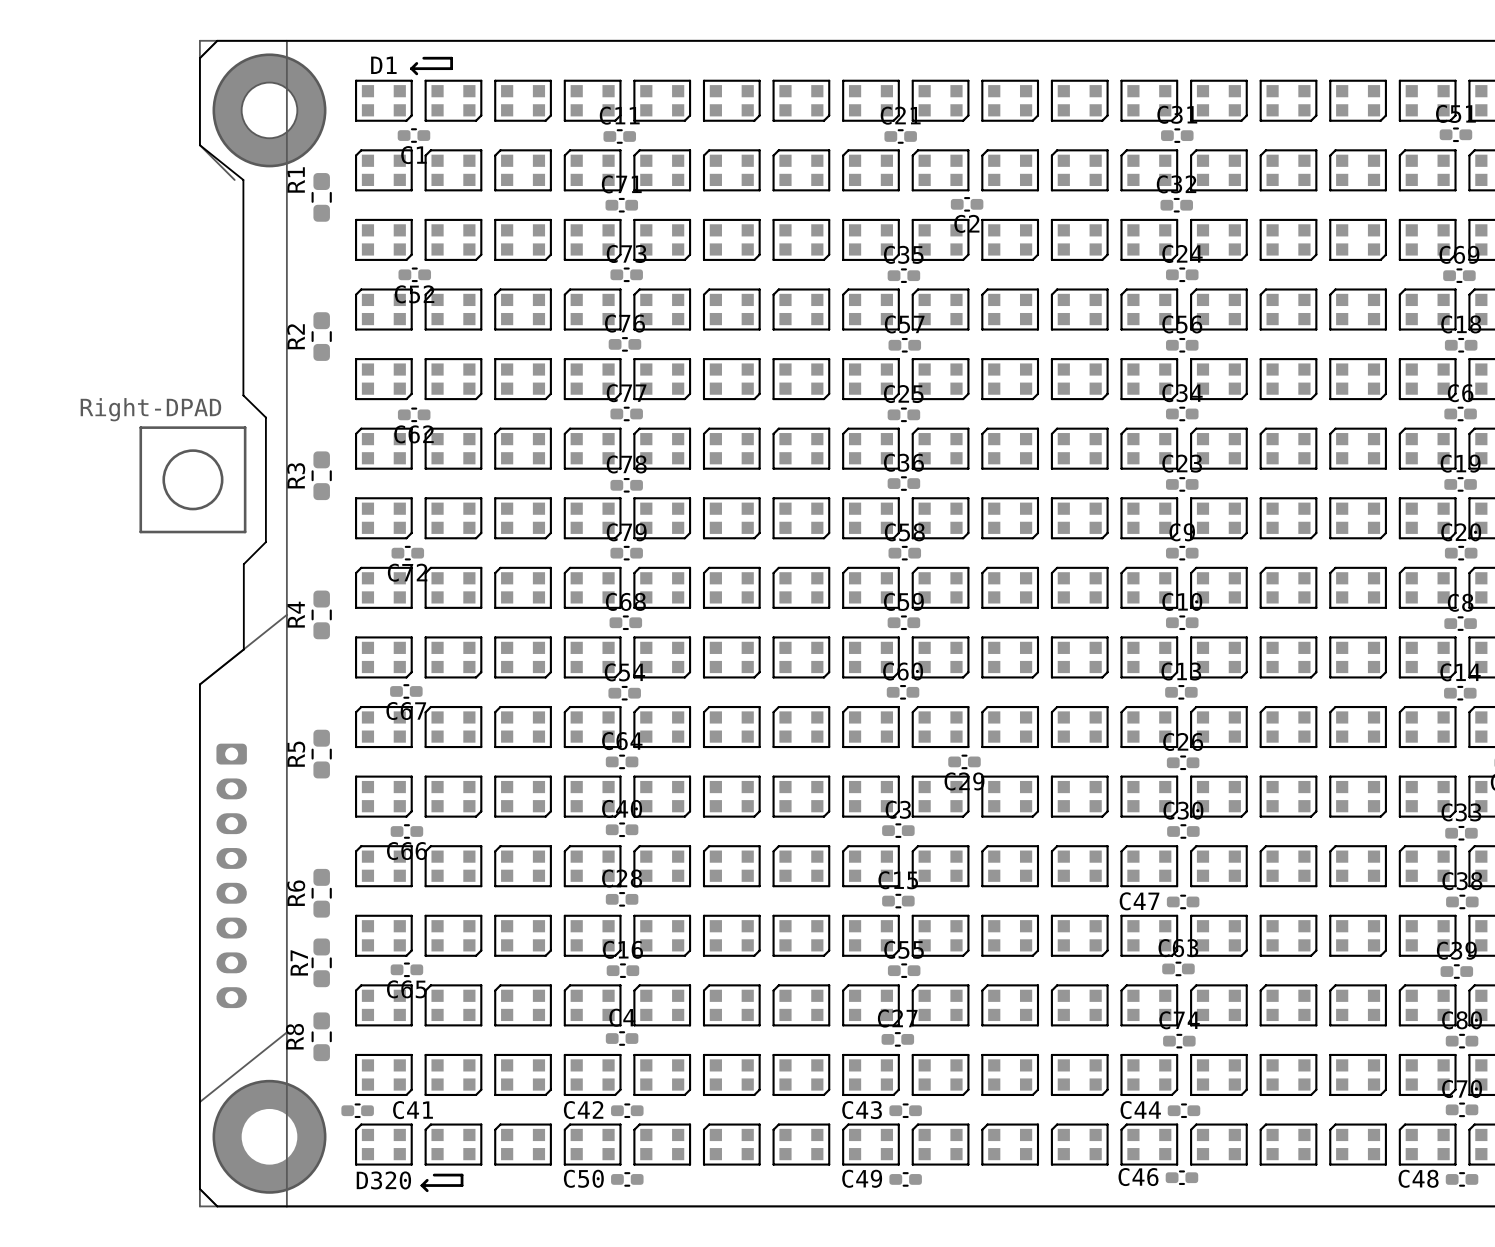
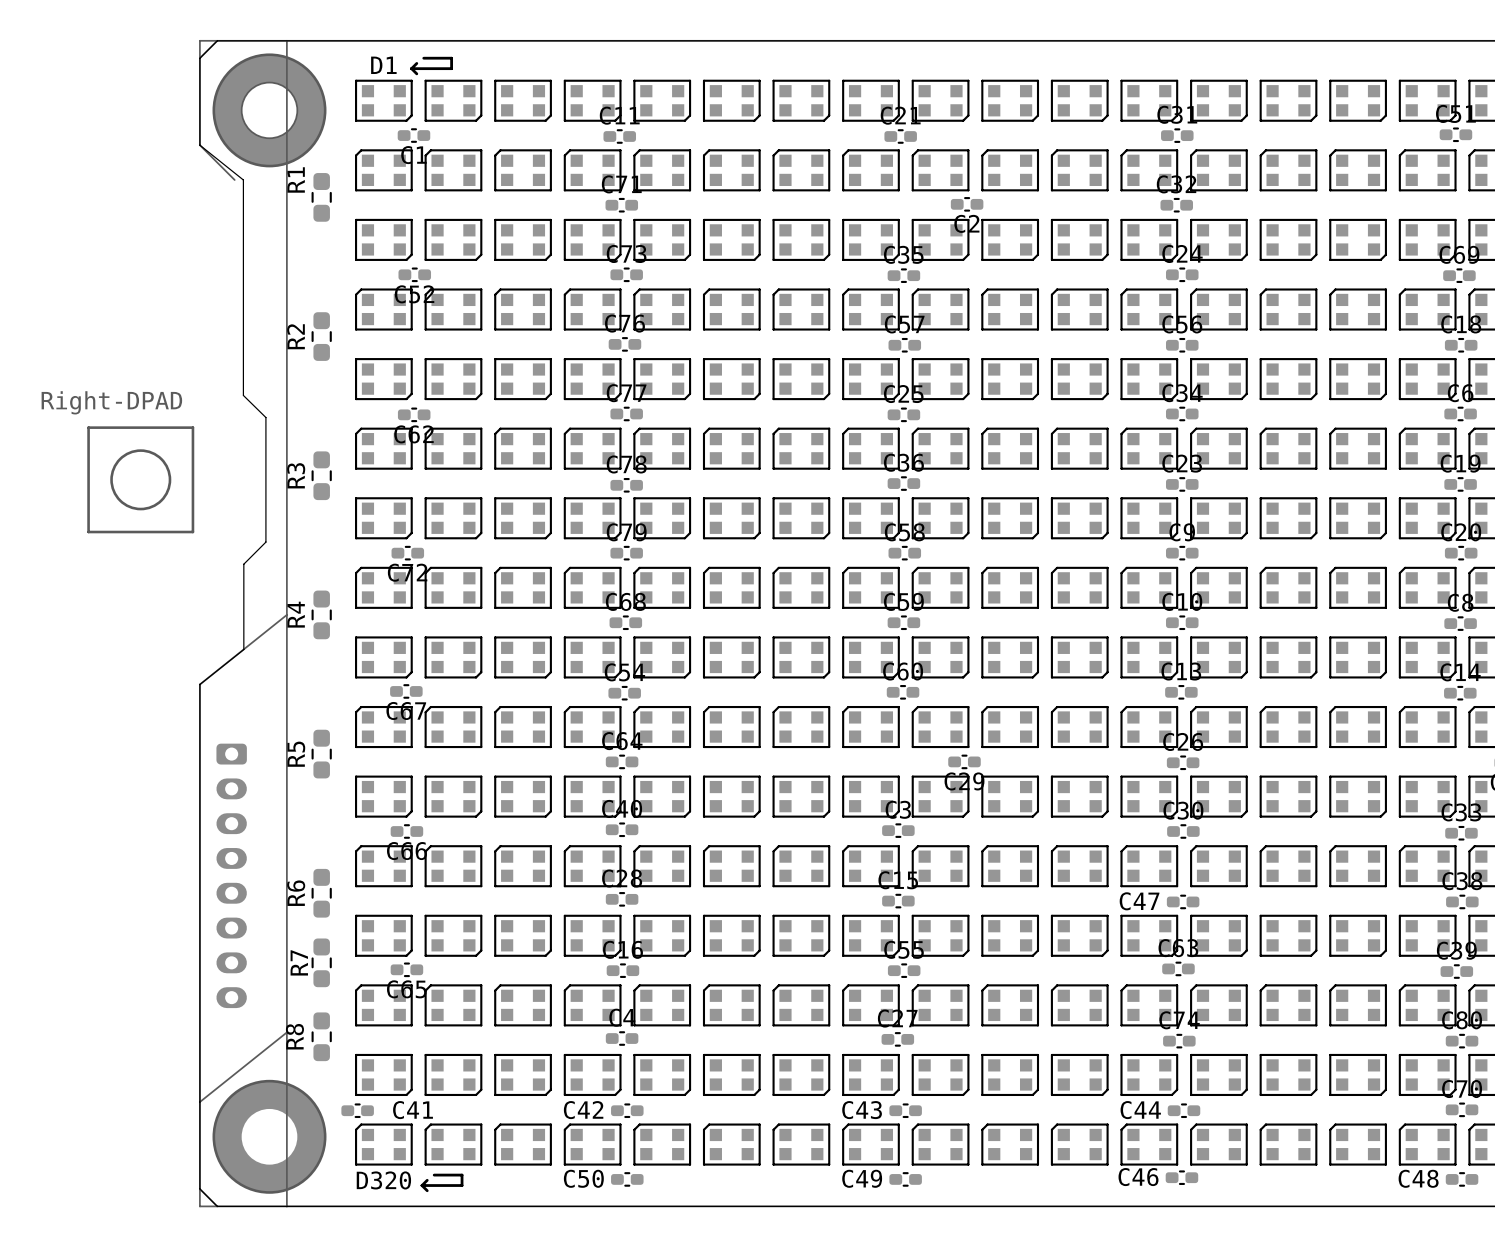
text position: Right-DPAD (150, 409) -> Right-DPAD (111, 402)
line: (140, 427) (140, 532) -> (140, 427) (88, 427) (88, 532) (140, 532)
line: (192, 427) (245, 427) (245, 532) (192, 532) -> (192, 427) (192, 532)
drawing position: (192, 479) -> (140, 479)

